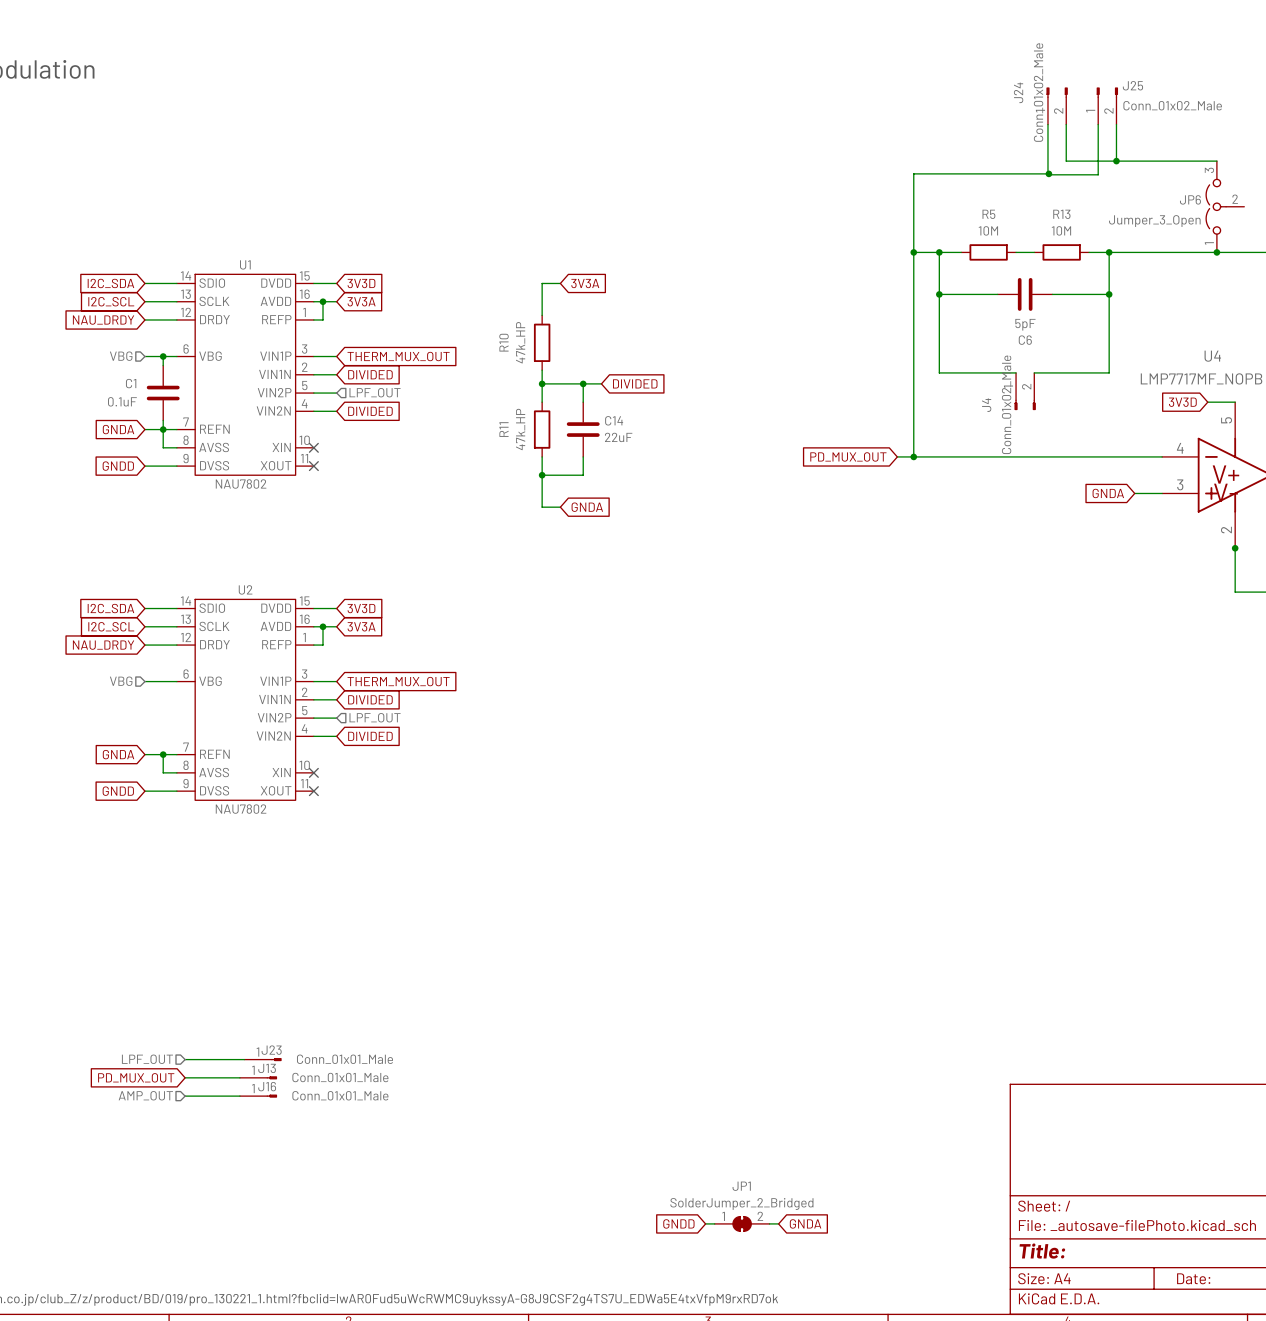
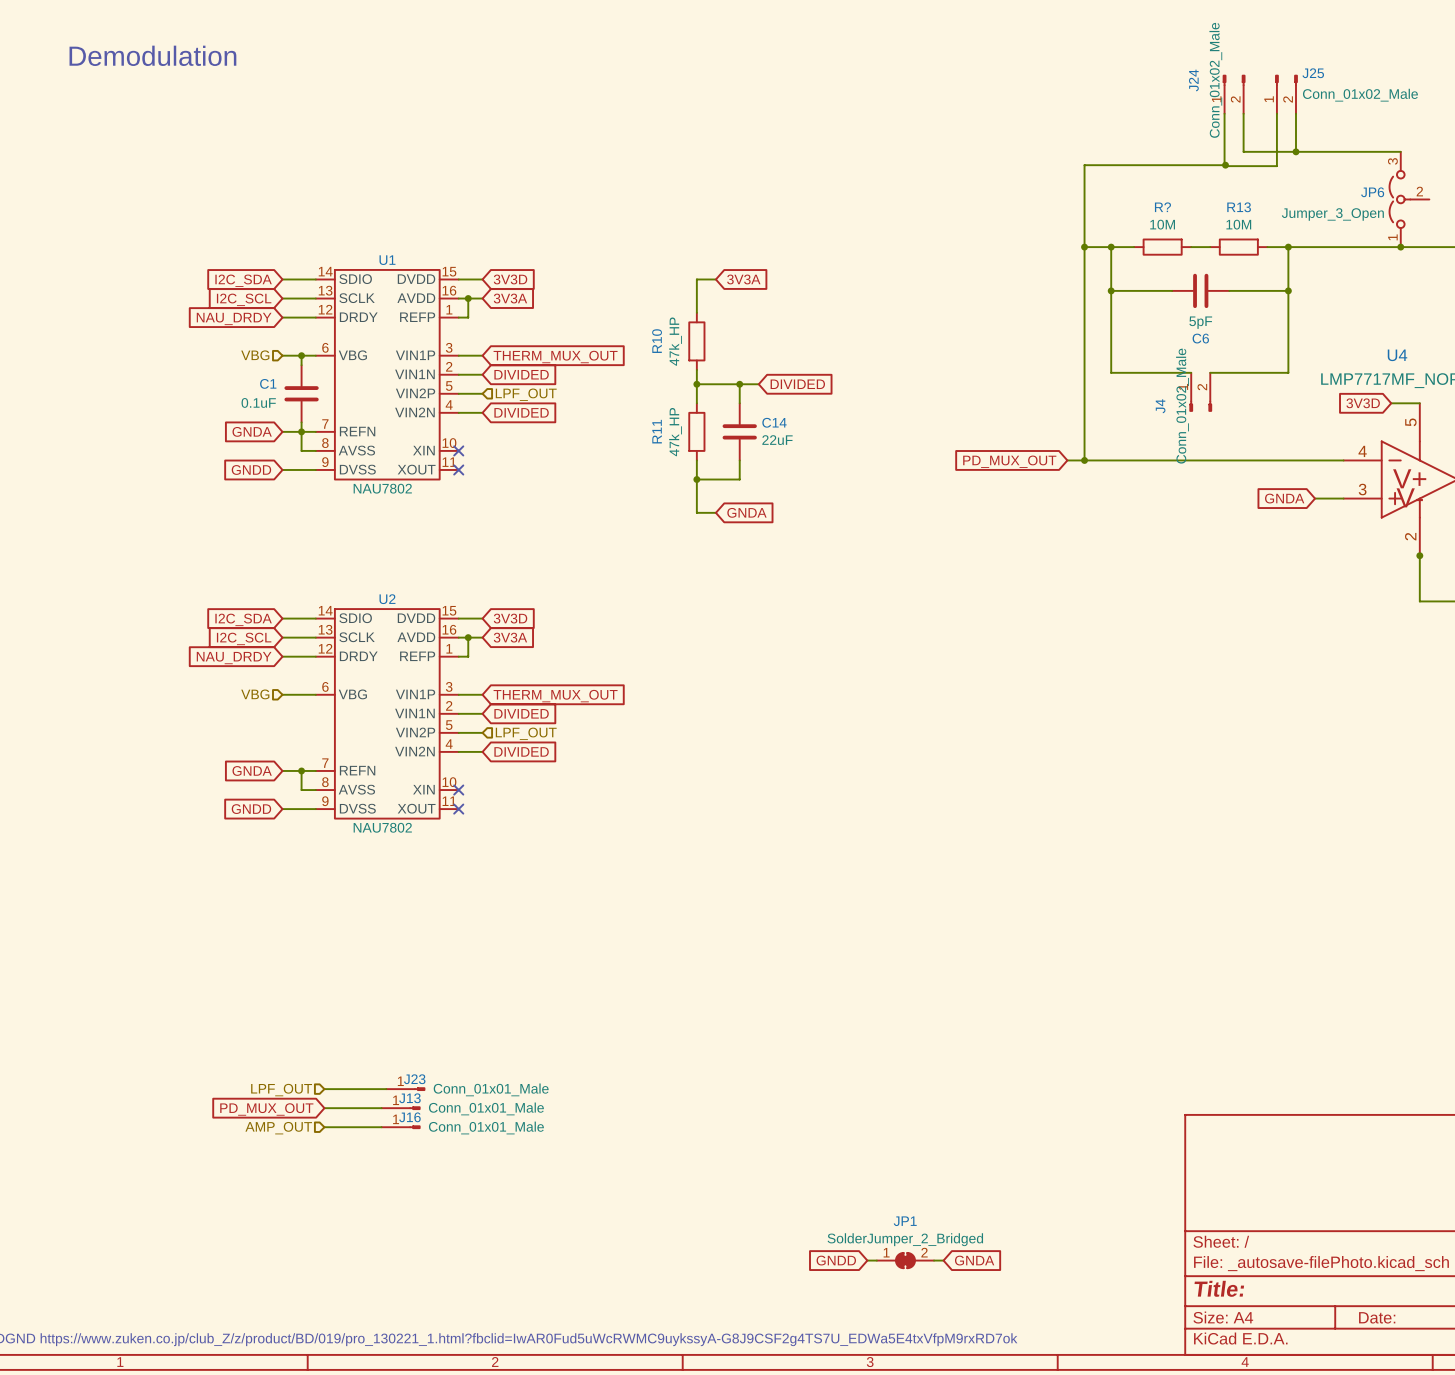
R5 name: R5 (988, 214) -> R? (1162, 207)

